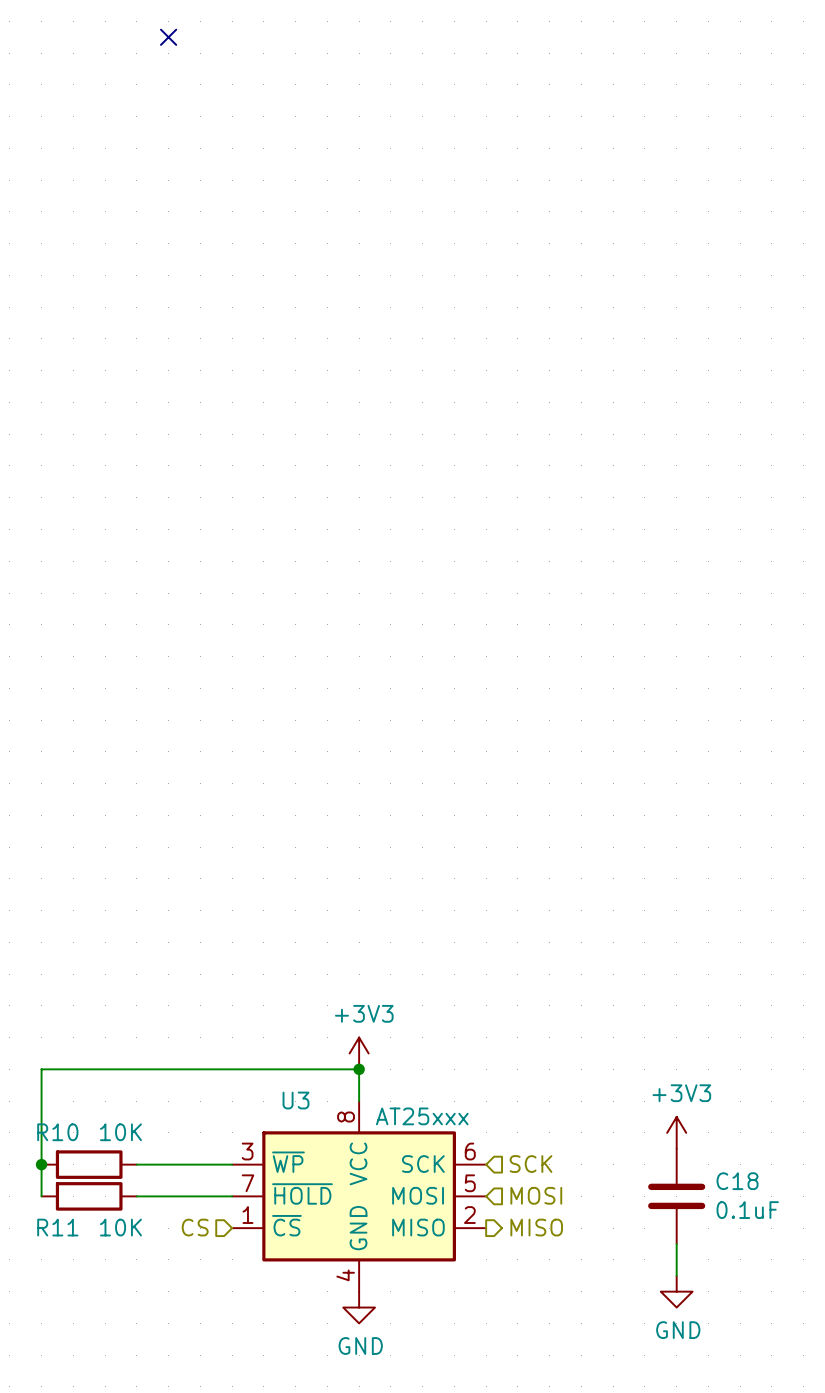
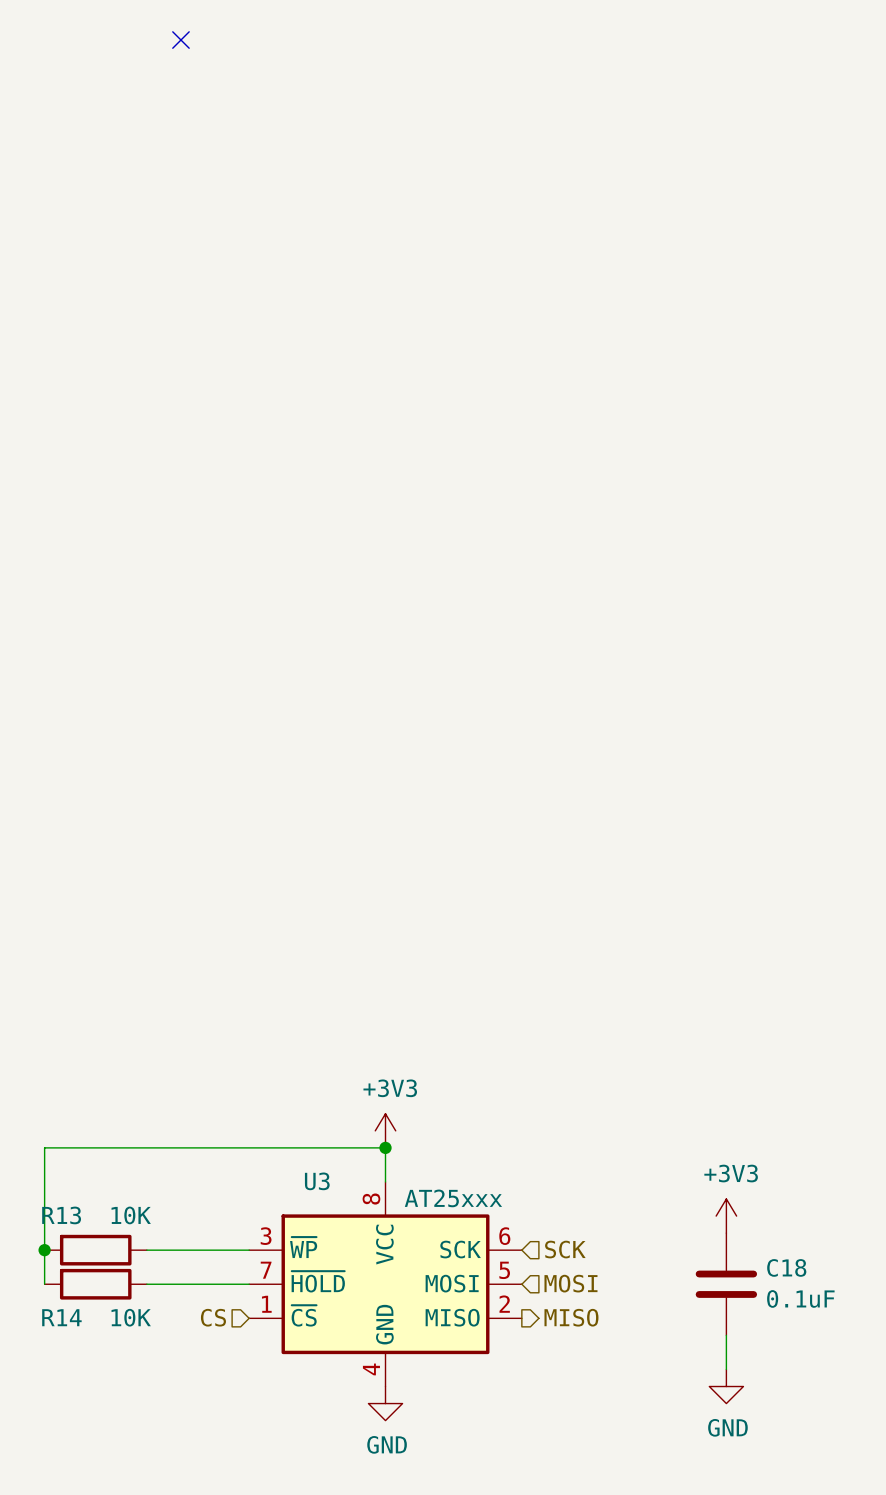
R10 name: R10 (57, 1132) -> R13 (61, 1215)
R11 name: R11 (57, 1227) -> R14 (61, 1317)

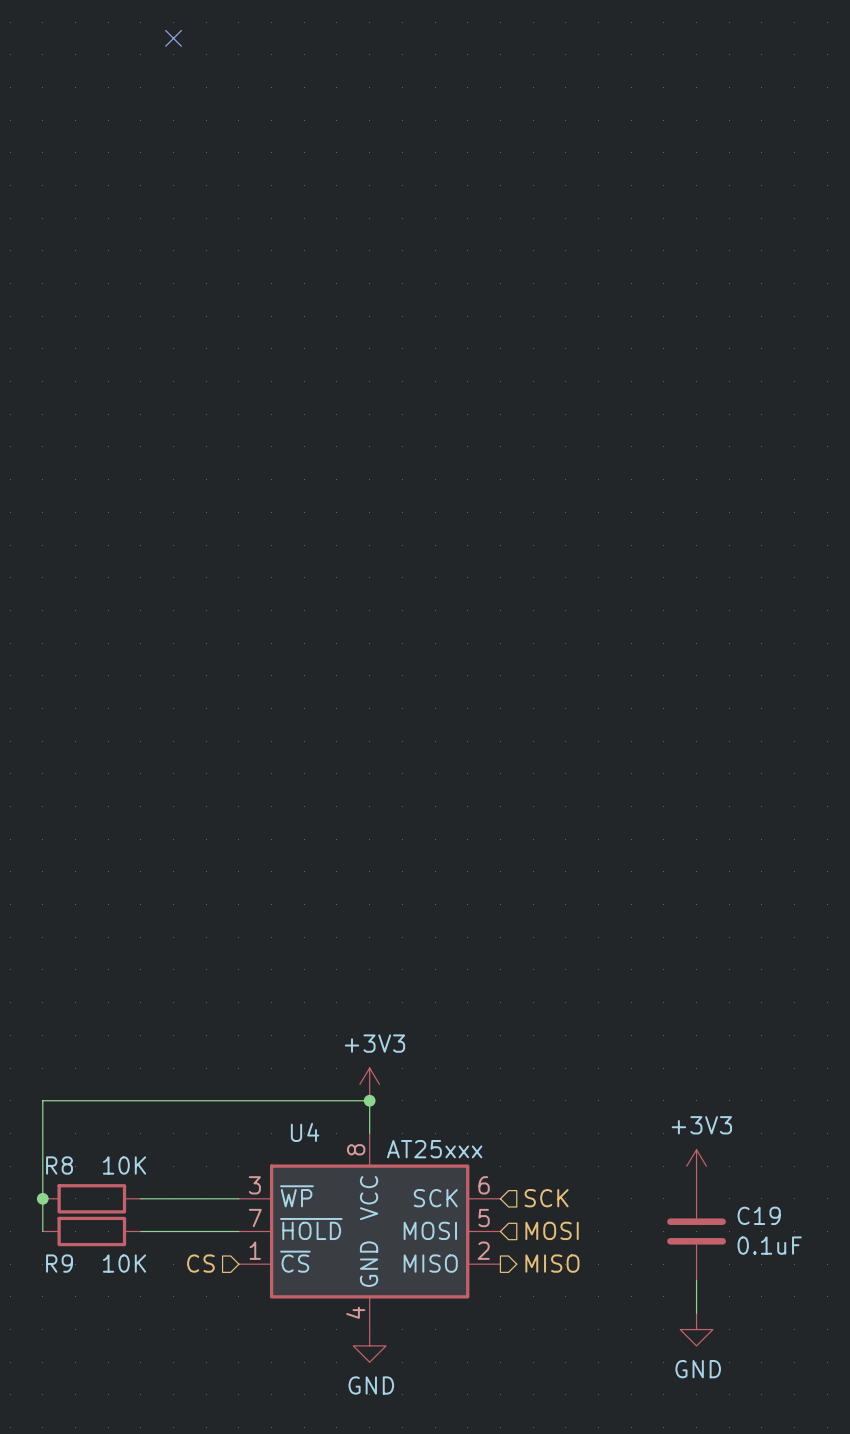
U3 name: U3 (317, 1181) -> U4 (305, 1132)
R13 name: R13 (61, 1215) -> R8 (59, 1165)
C18 name: C18 (786, 1267) -> C19 (759, 1215)
R14 name: R14 (61, 1317) -> R9 (59, 1263)

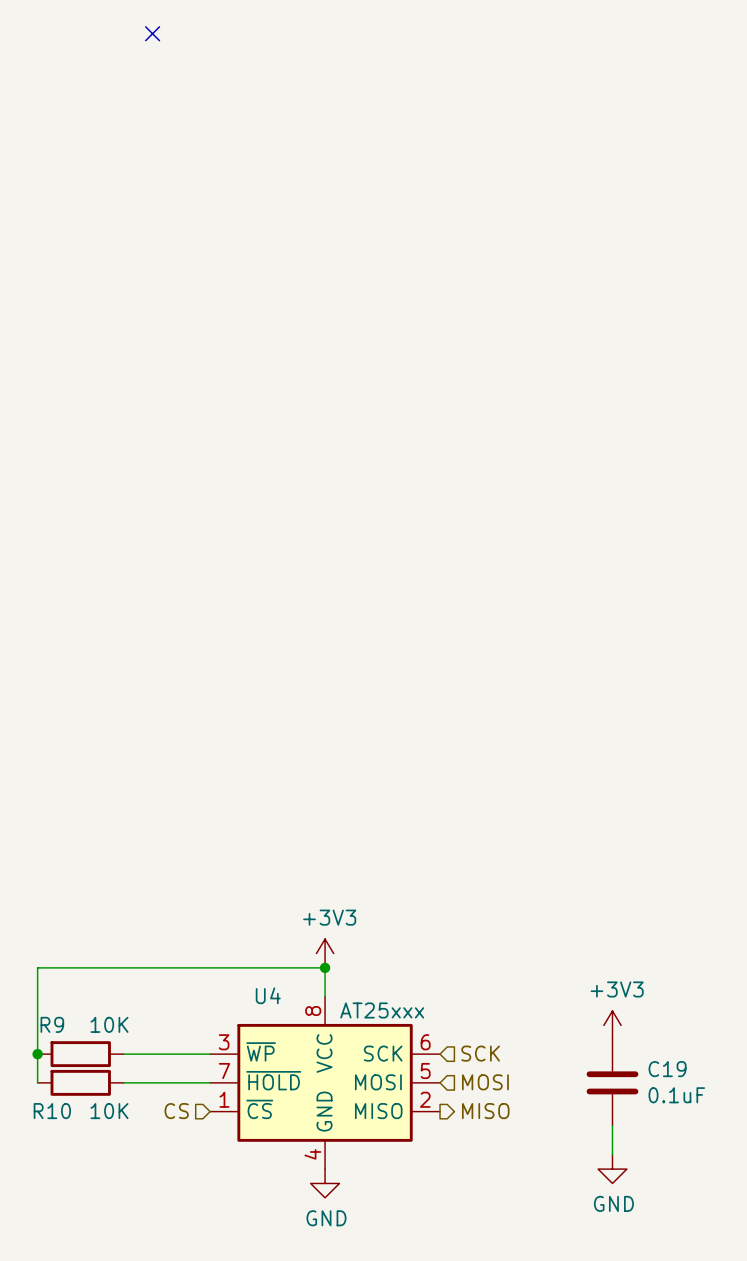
R8 name: R8 (59, 1165) -> R9 (52, 1024)
R9 name: R9 (59, 1263) -> R10 (52, 1111)

